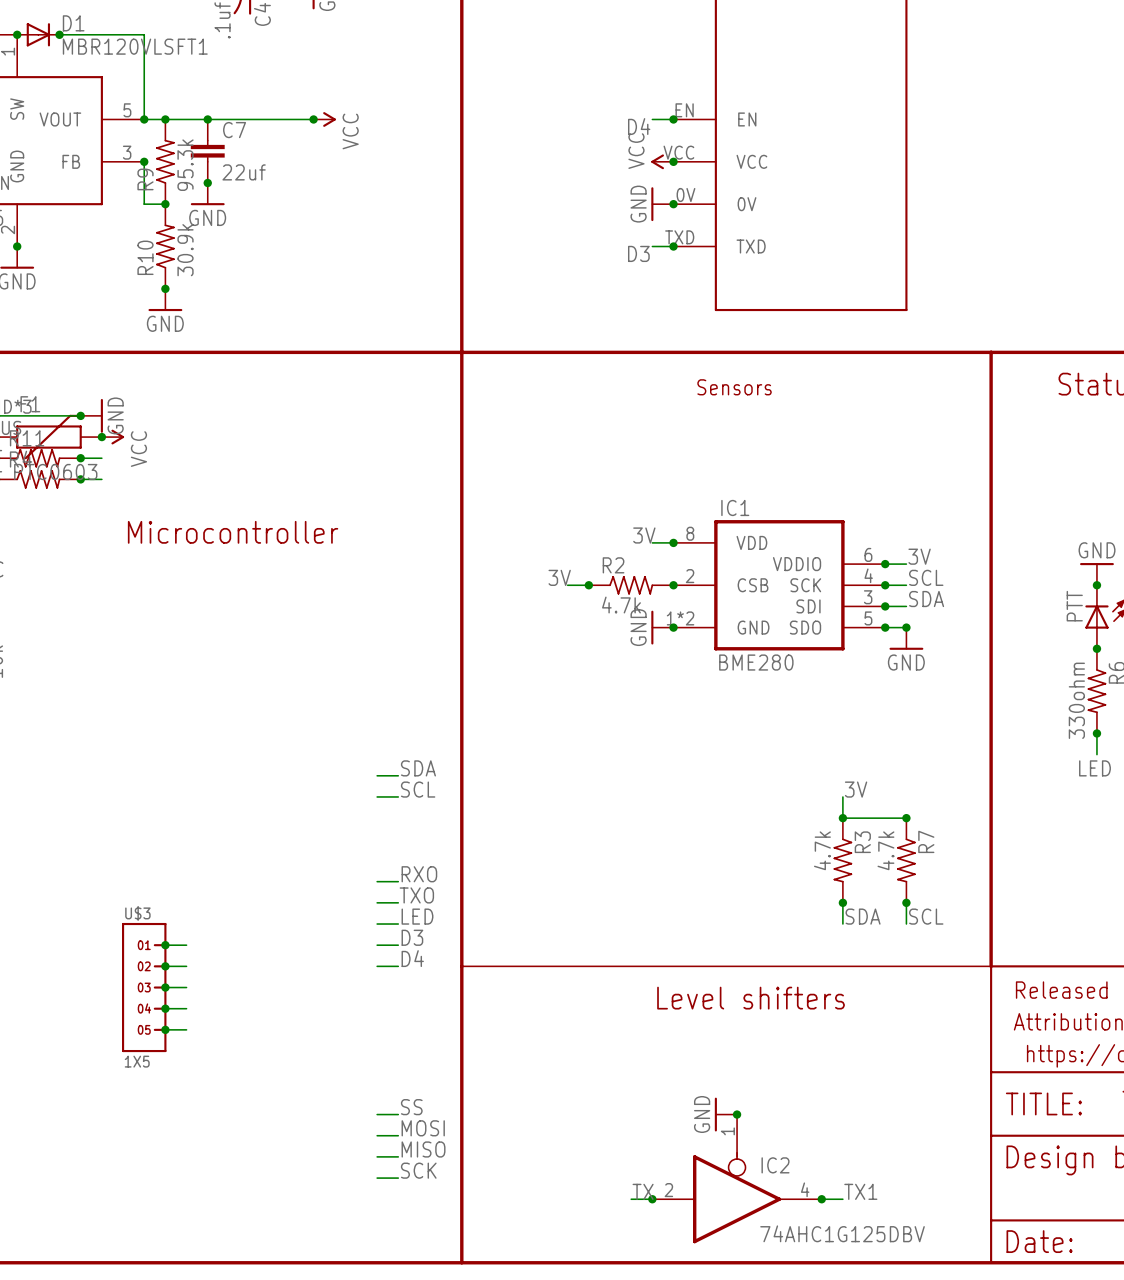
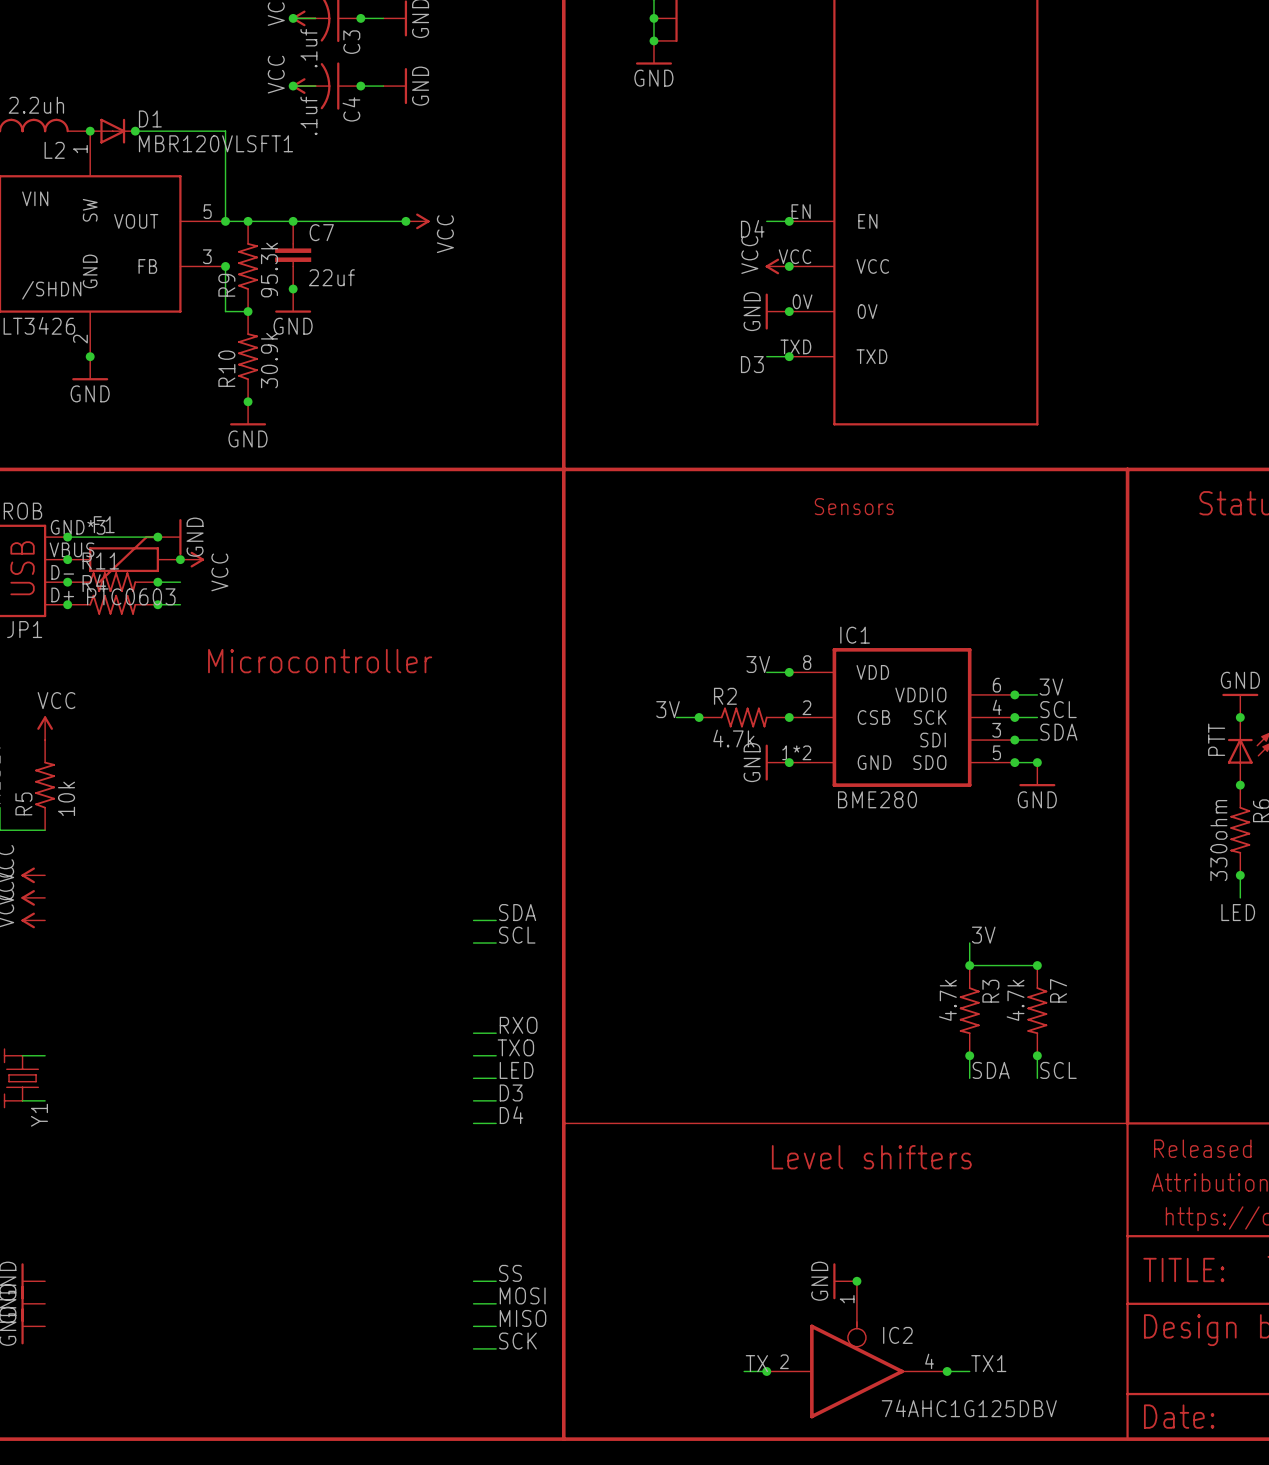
wire: (165, 945) (186, 945) -> none
junction: (165, 945) -> none
wire: (165, 966) (186, 966) -> none
junction: (165, 966) -> none
U$3: 1X5 (144, 987) -> none
wire: (165, 987) (186, 987) -> none
junction: (165, 987) -> none
wire: (165, 1008) (186, 1008) -> none
junction: (165, 1008) -> none
wire: (165, 1029) (186, 1029) -> none
junction: (165, 1029) -> none

